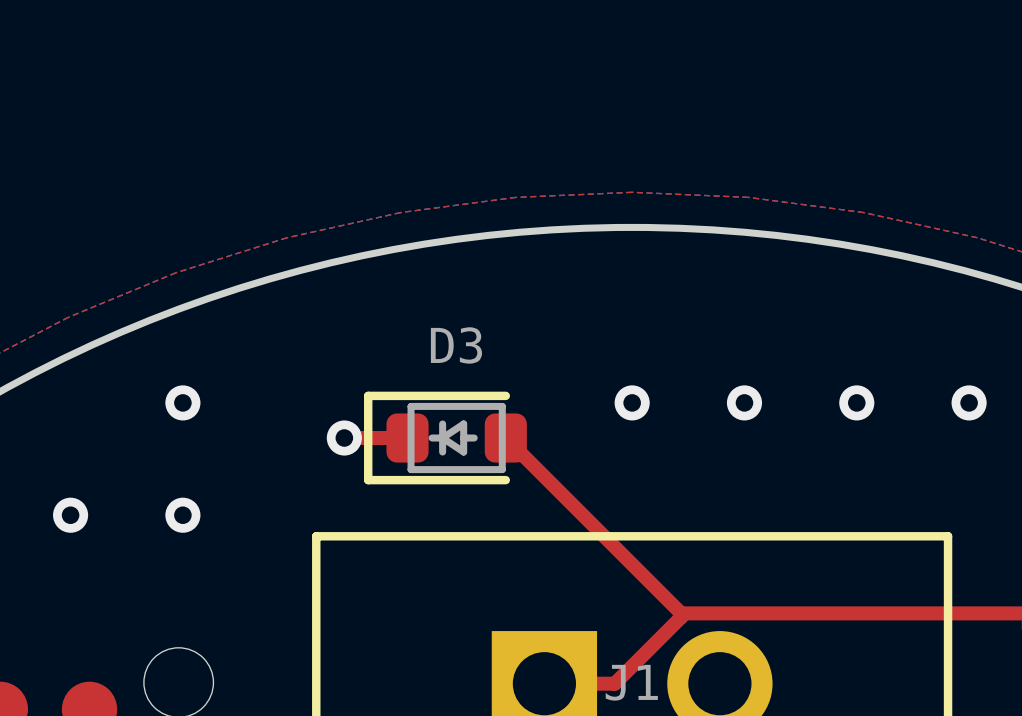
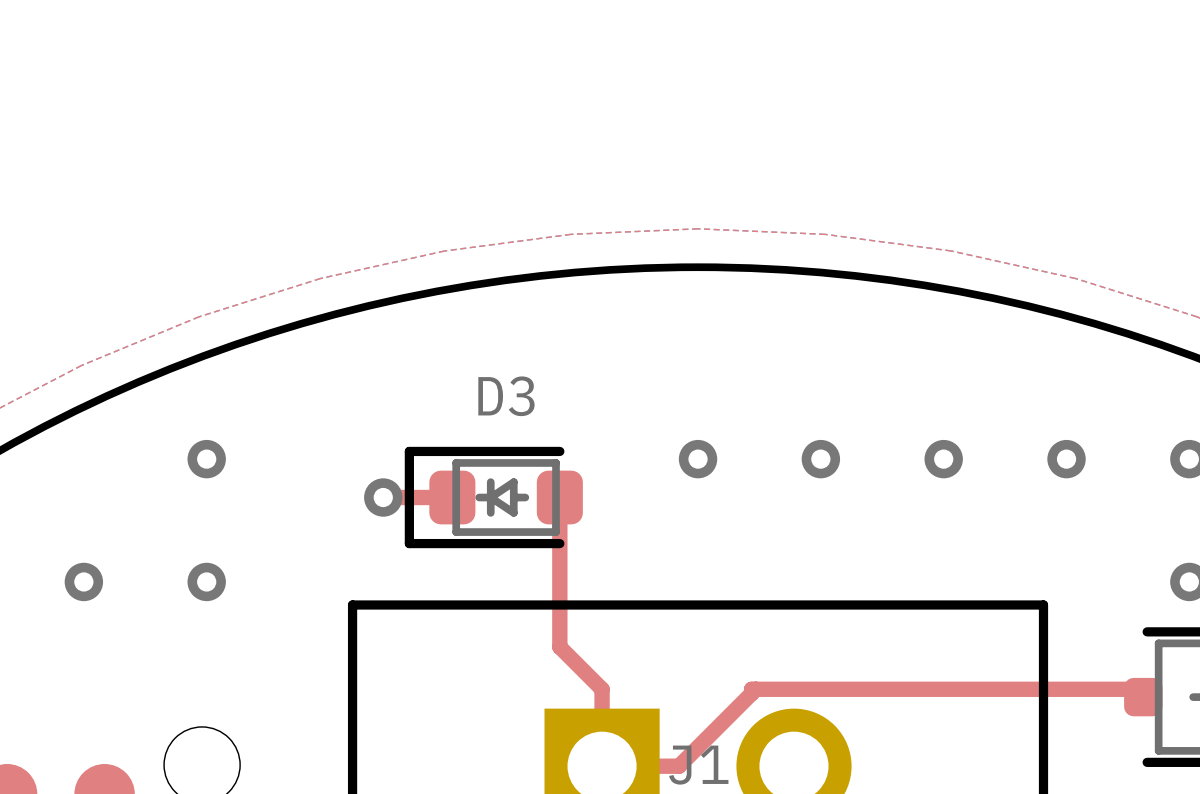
top track: (505, 438) (681, 613) -> (559, 497) (559, 647) (602, 689) (602, 766)

